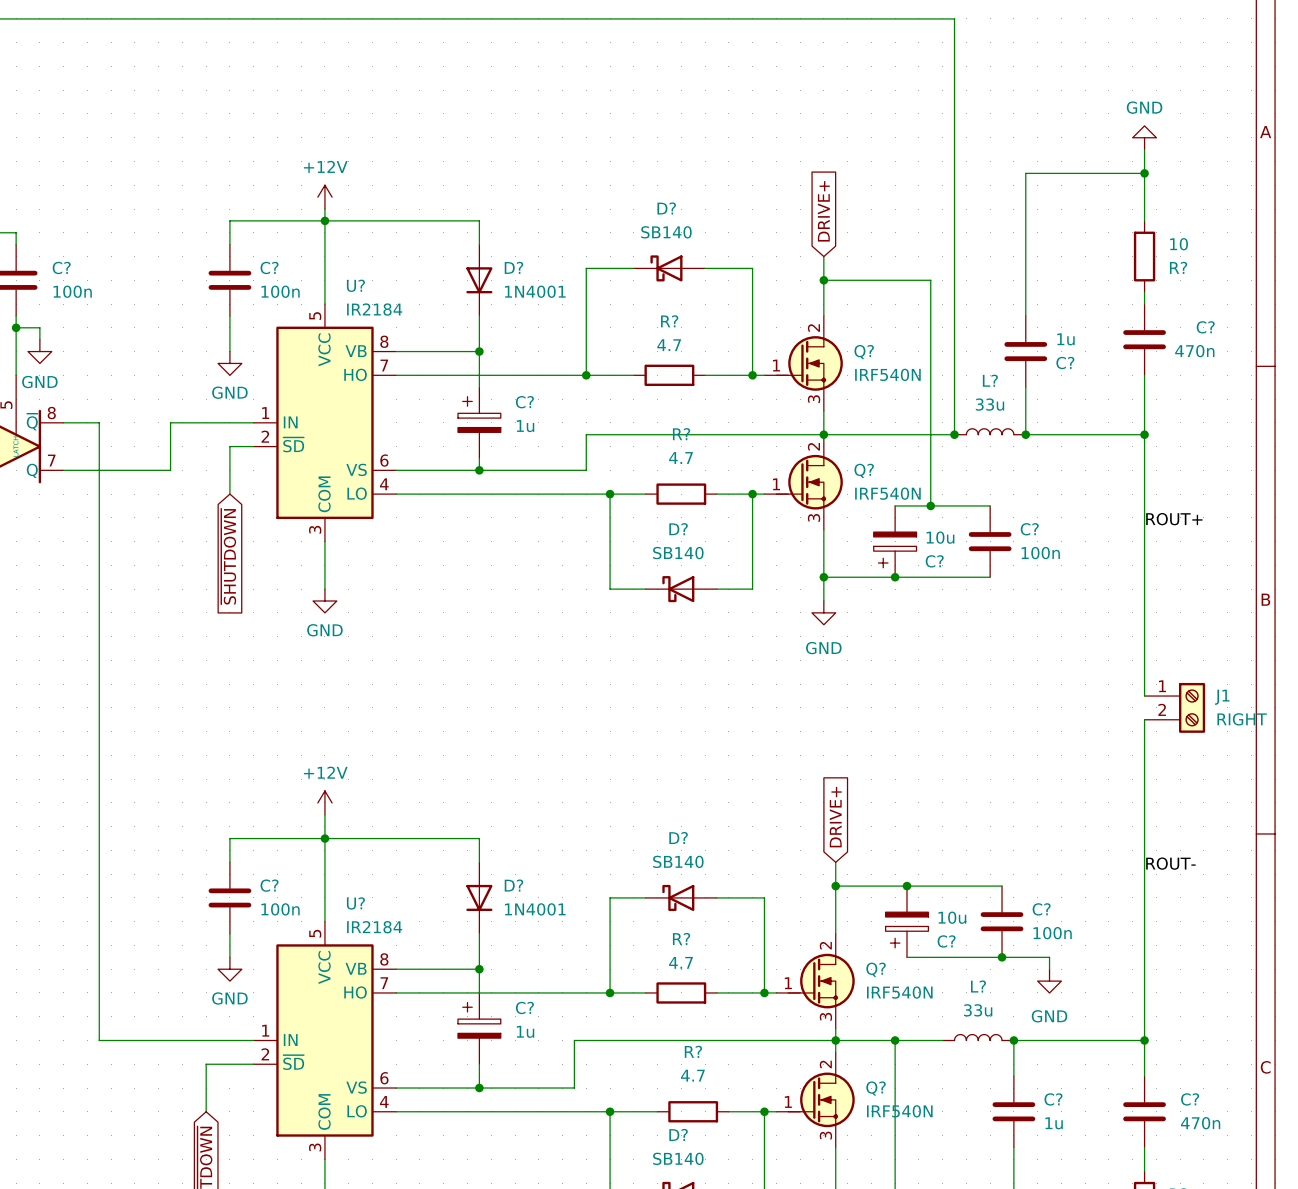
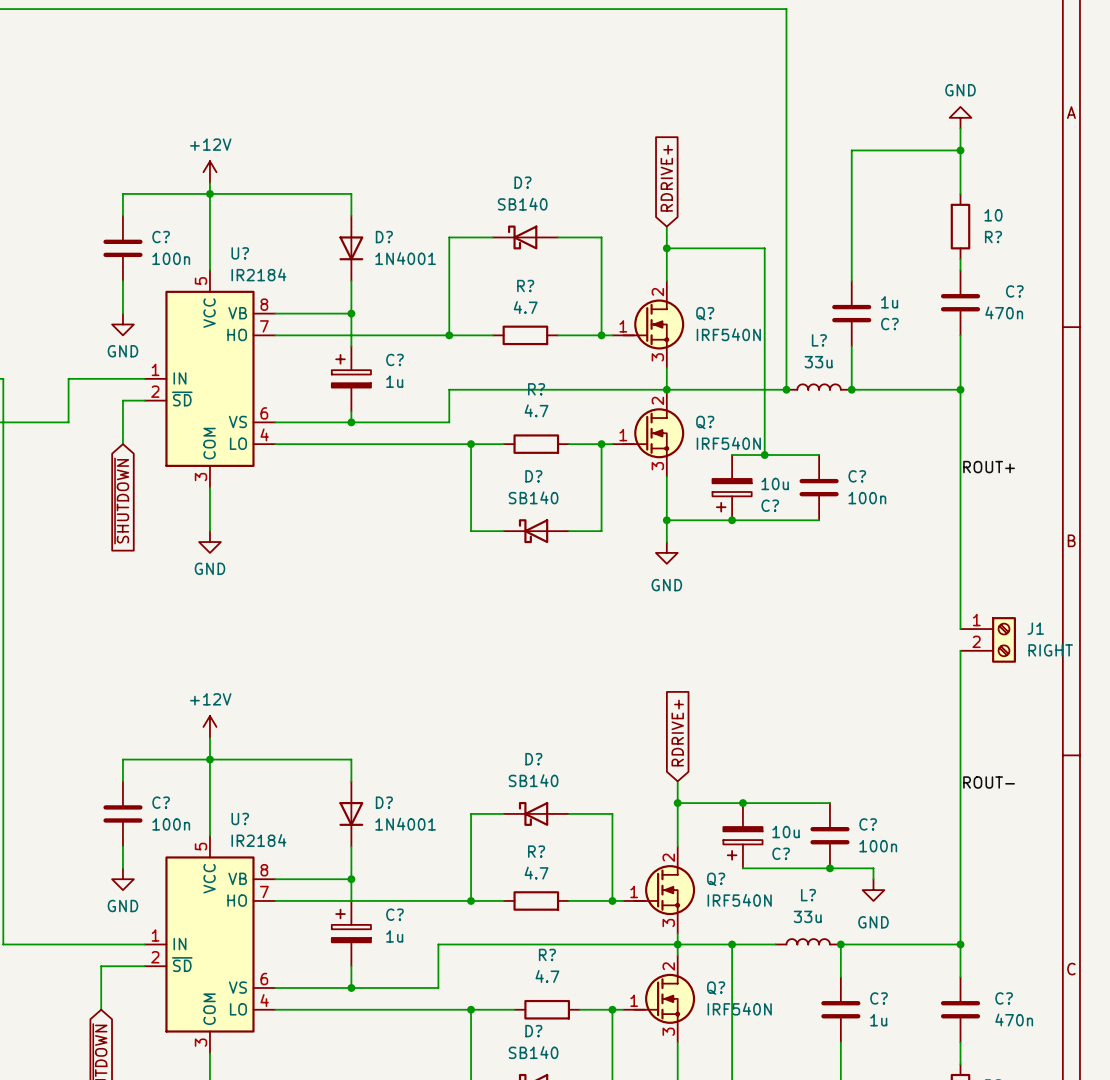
global label: DRIVE+ (823, 211) -> RDRIVE+ (666, 178)
global label: DRIVE+ (835, 817) -> RDRIVE+ (677, 733)

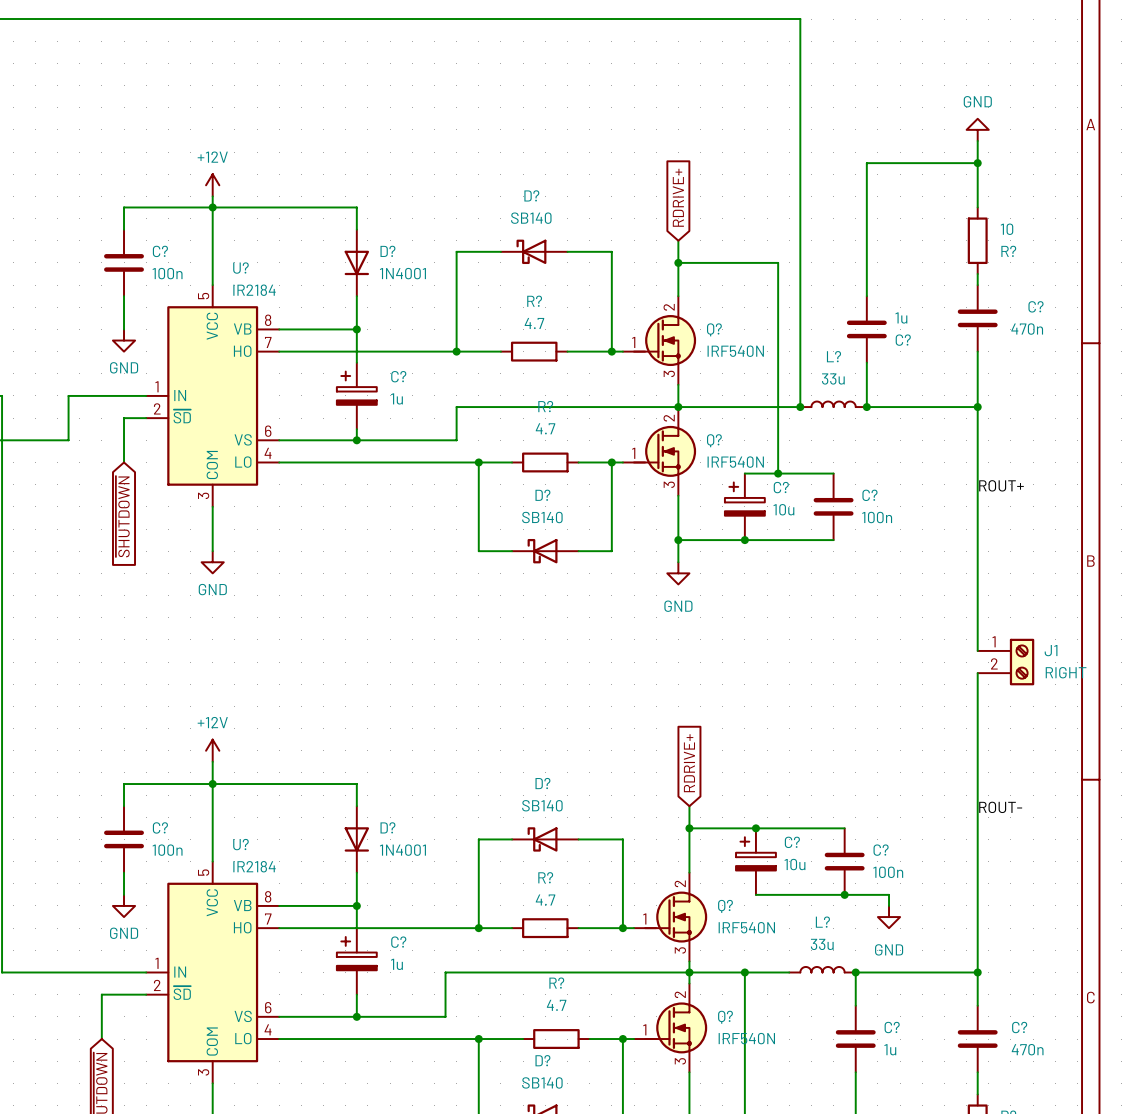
C? flip: as is (732, 495) -> up-down (744, 499)
C? flip: as is (742, 843) -> up-down (755, 853)

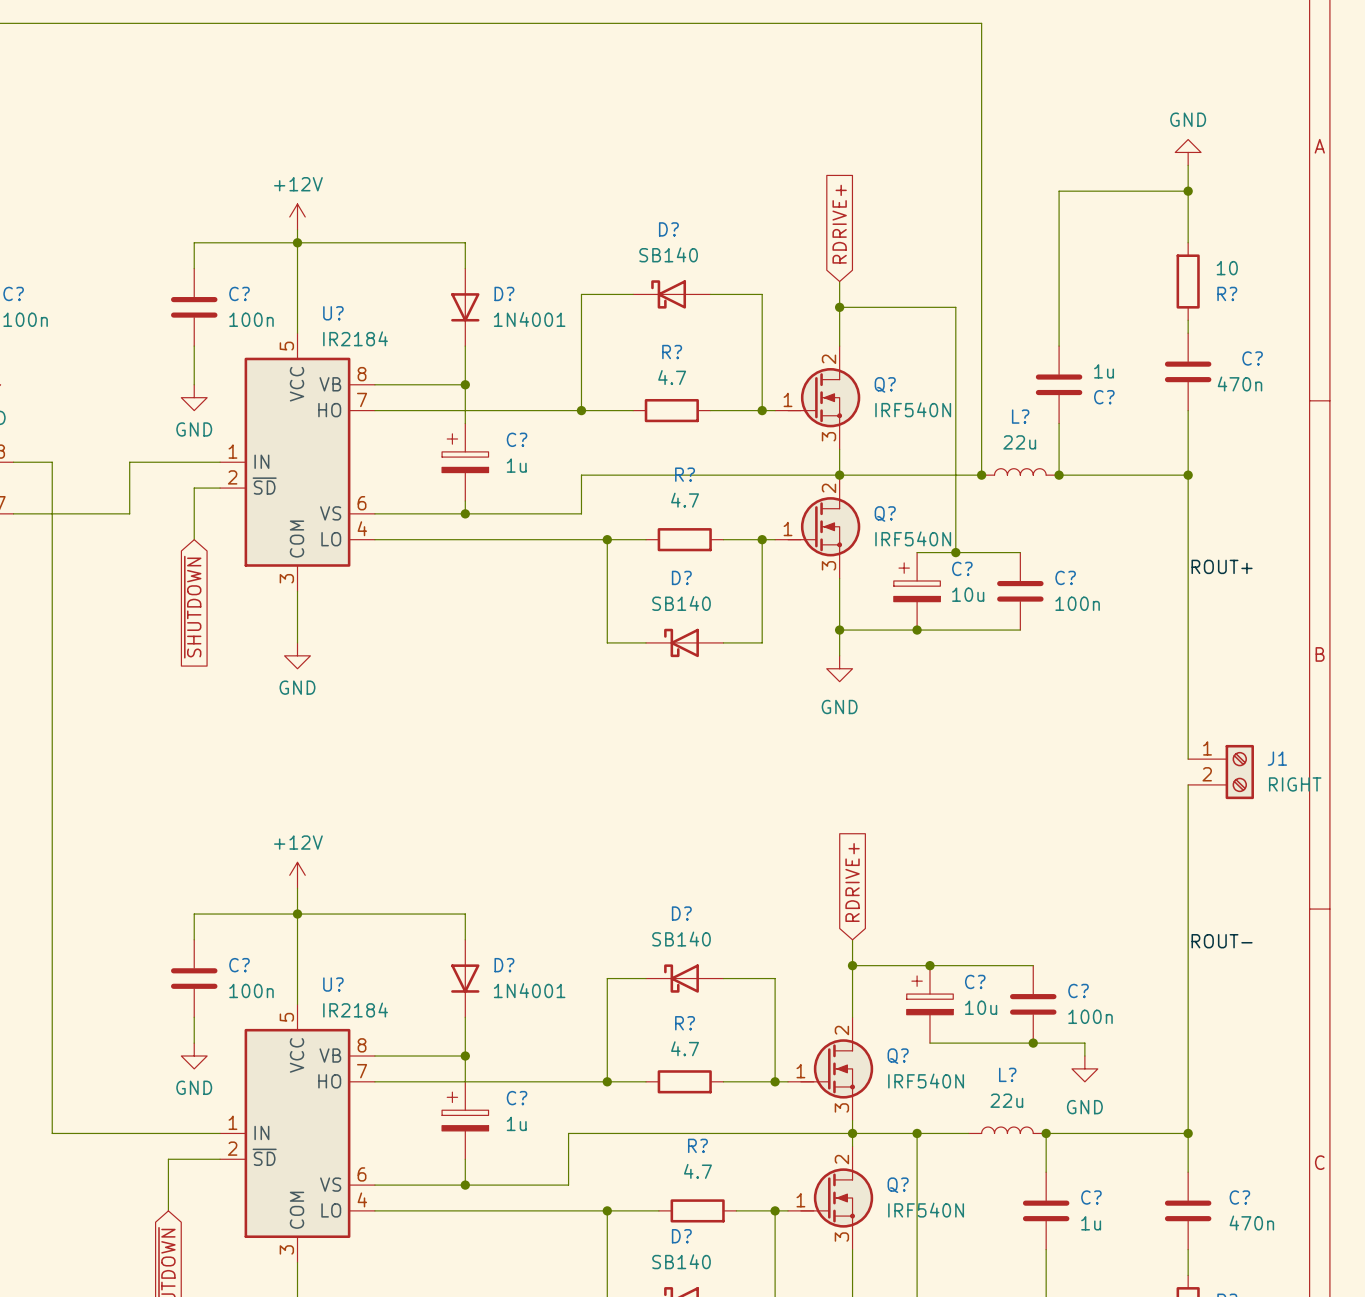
L? value: 33u (833, 378) -> 22u (1019, 442)
L? value: 33u (822, 944) -> 22u (1006, 1100)

